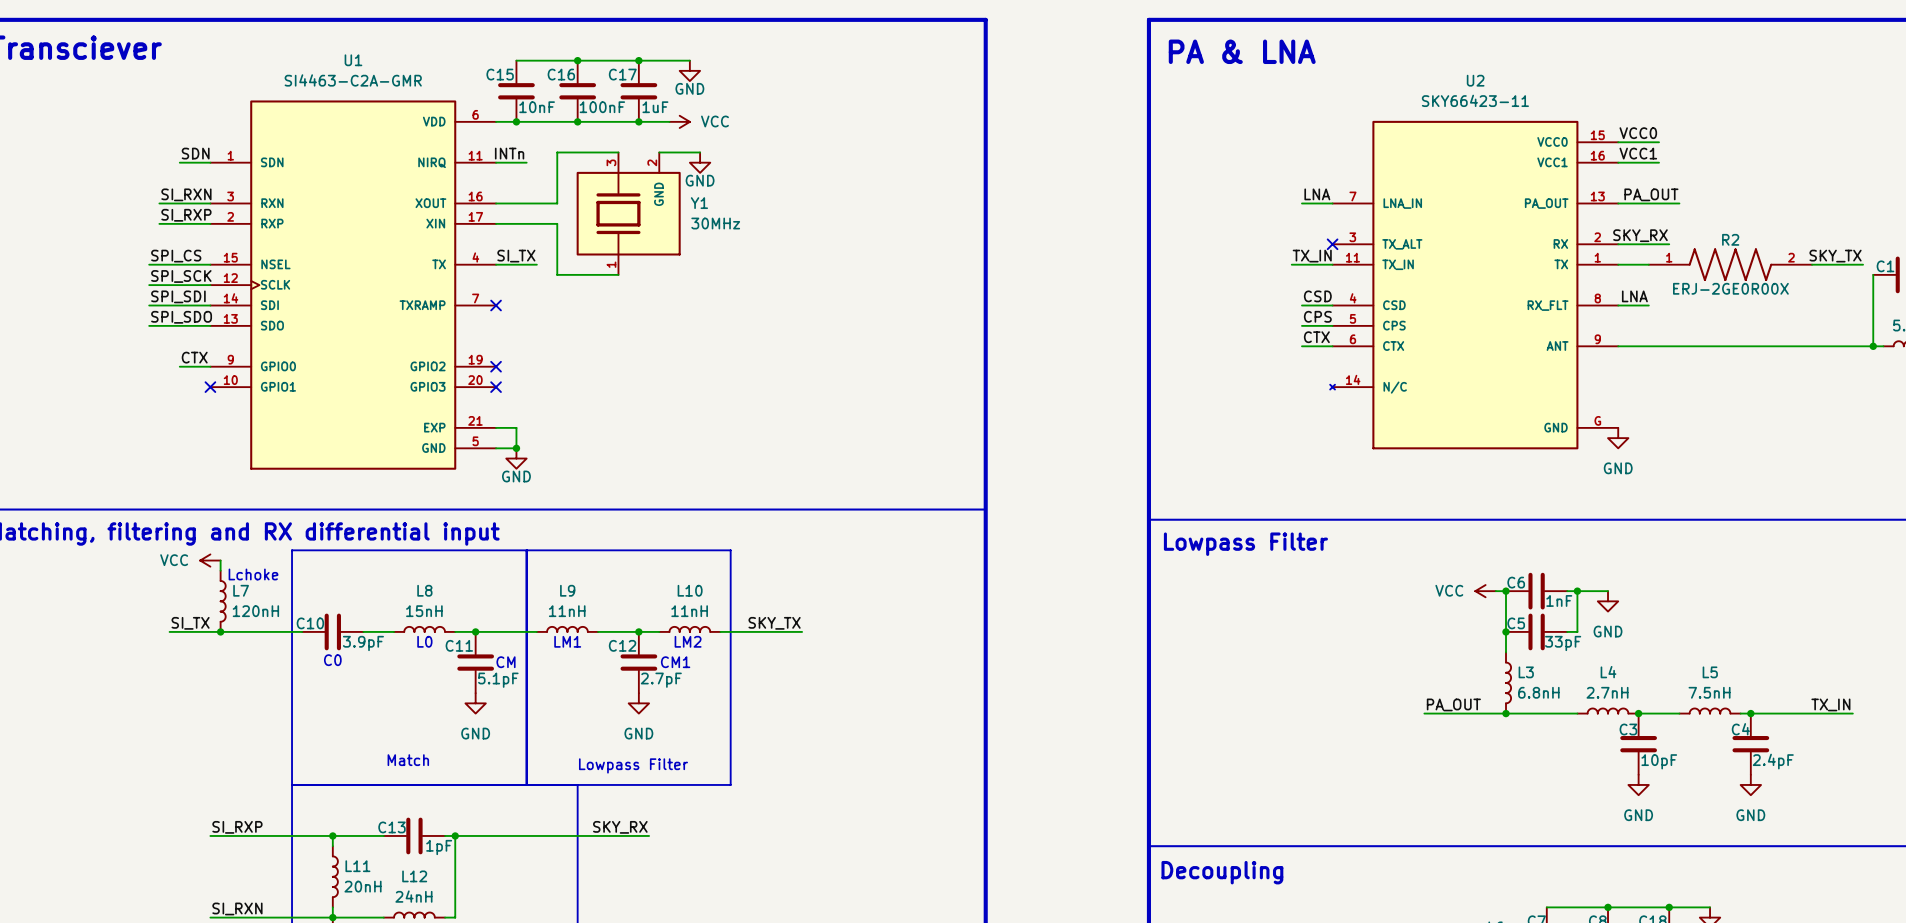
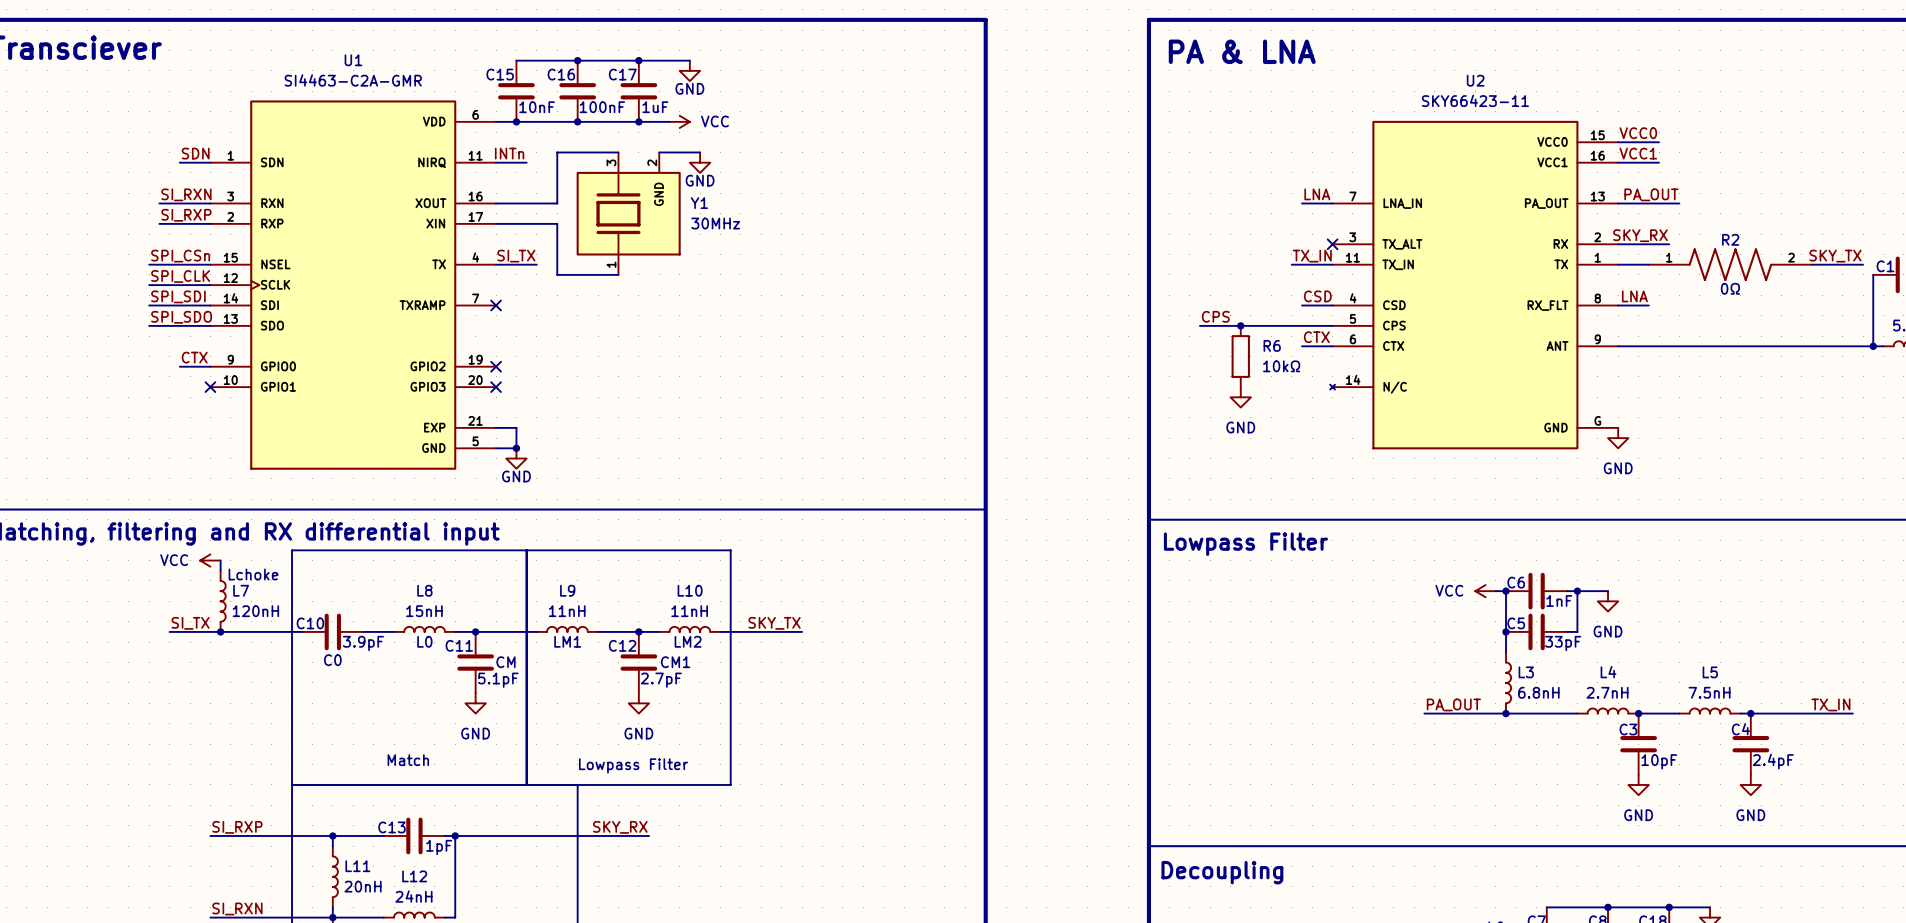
label: SPI_CS (176, 256) -> SPI_CSn (180, 256)
label: SPI_SCK (181, 276) -> SPI_CLK (180, 276)
R2 value: ERJ-2GE0R00X (1730, 288) -> 0Ω (1730, 288)
label position: CPS (1317, 316) -> CPS (1215, 316)
wire: none -> (1199, 325) (1301, 325)
junction: none -> (1240, 325)
R6: none -> 10kΩ (1240, 356)
power symbol: none -> GND (1240, 397)

